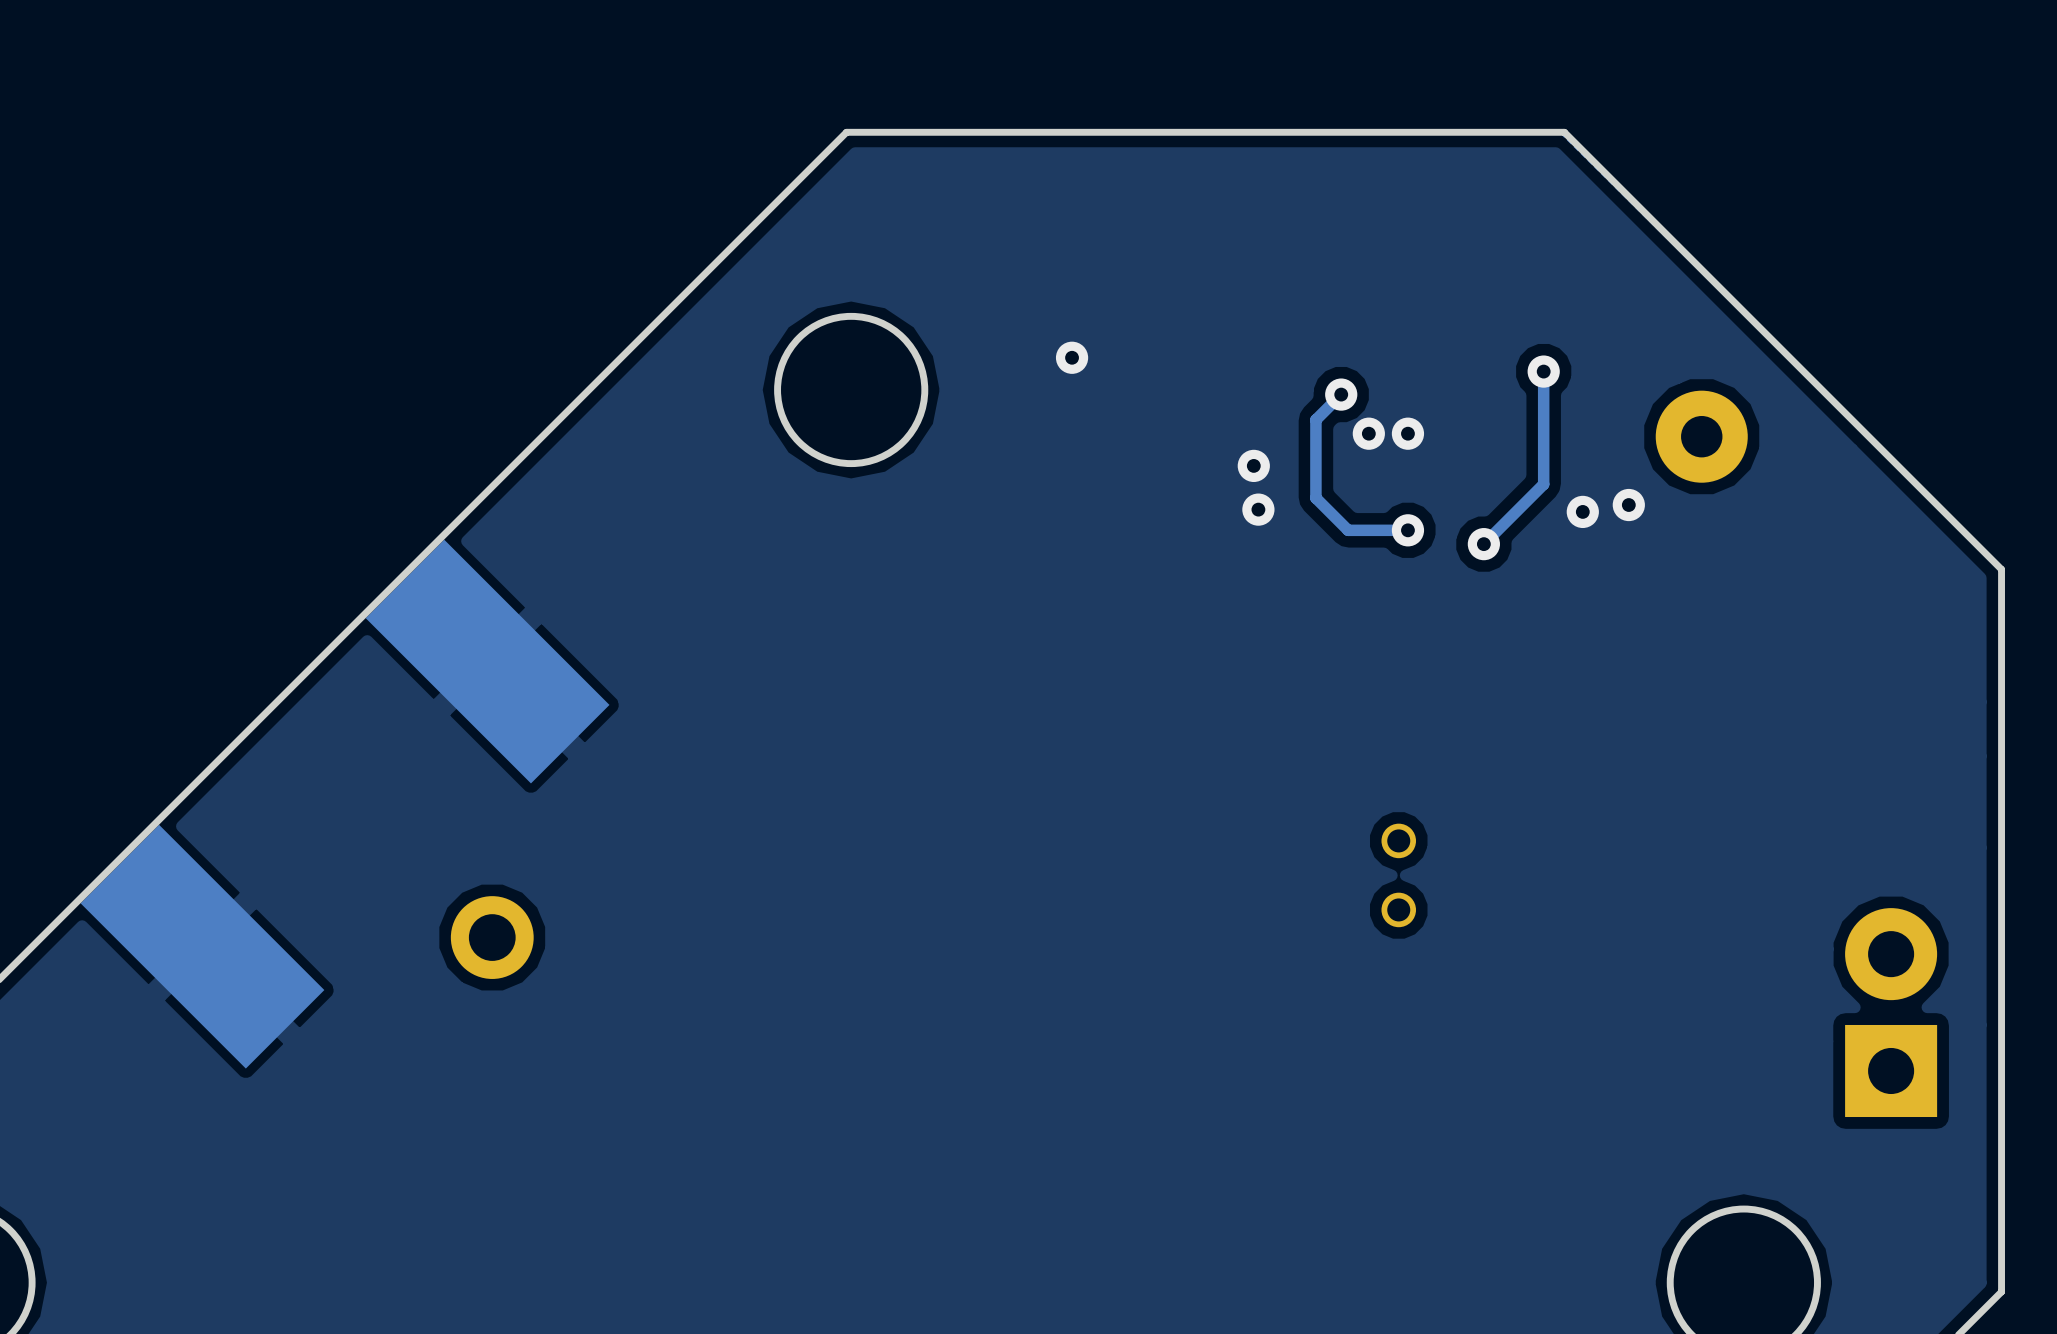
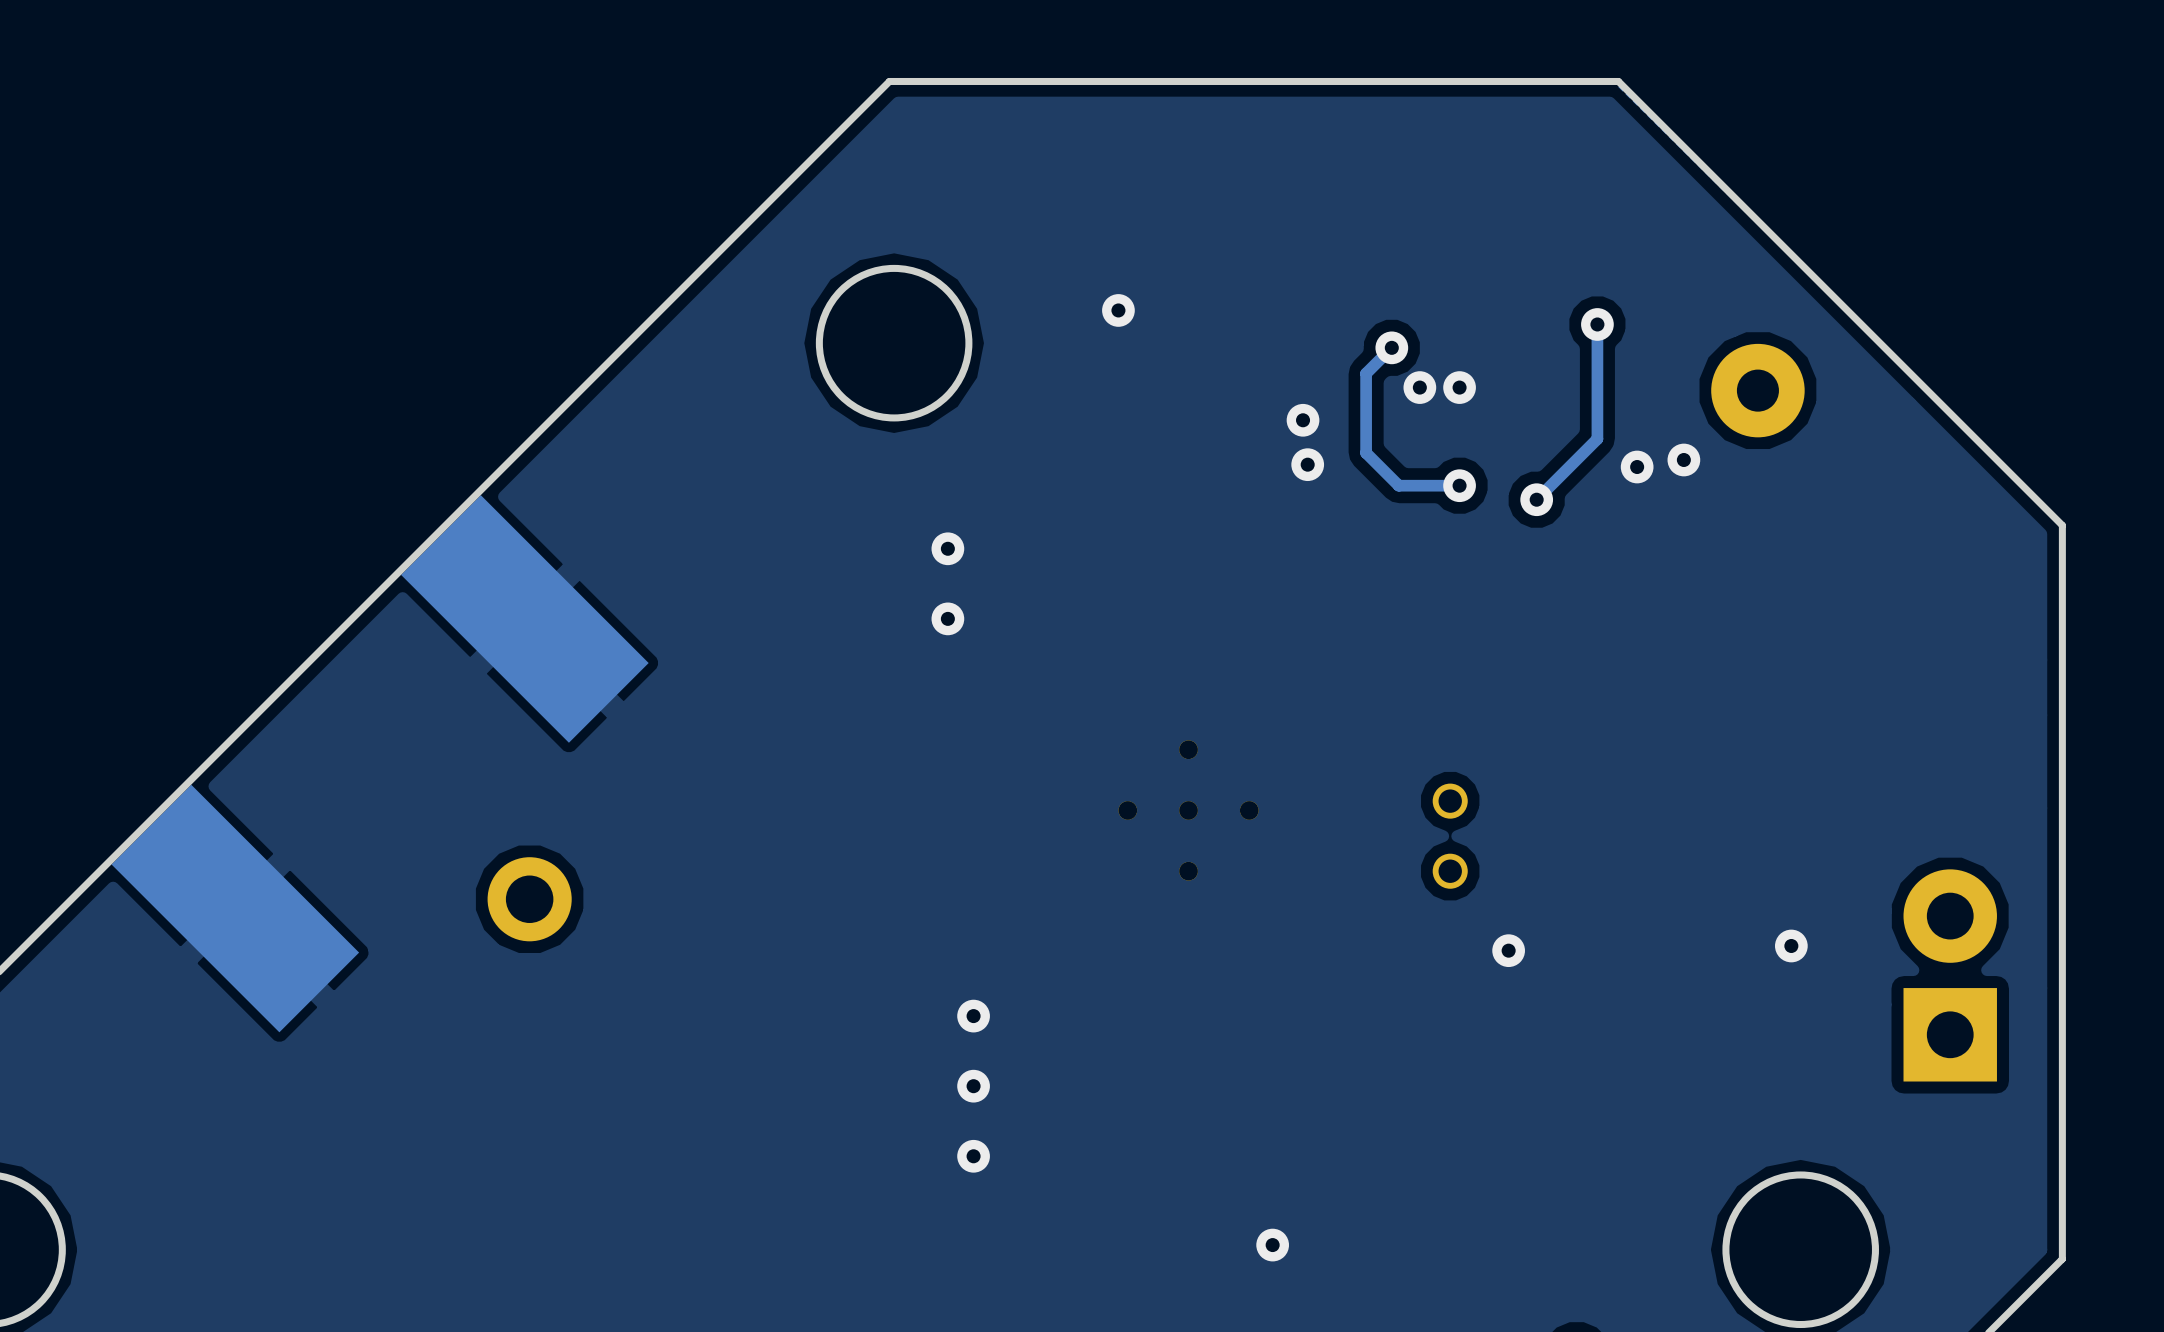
via: none -> (947, 548)
via: none -> (947, 618)
part: none -> (1188, 810)
via: none -> (1791, 945)
via: none -> (1508, 950)
via: none -> (973, 1016)
via: none -> (973, 1086)
via: none -> (973, 1156)
via: none -> (1272, 1245)

